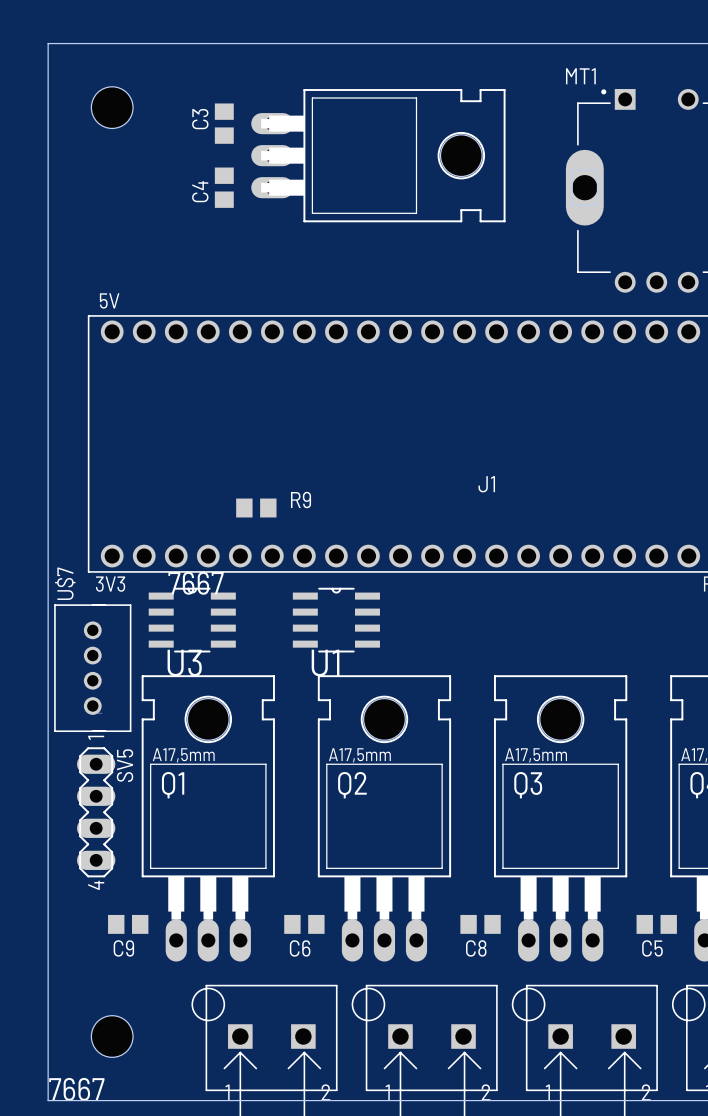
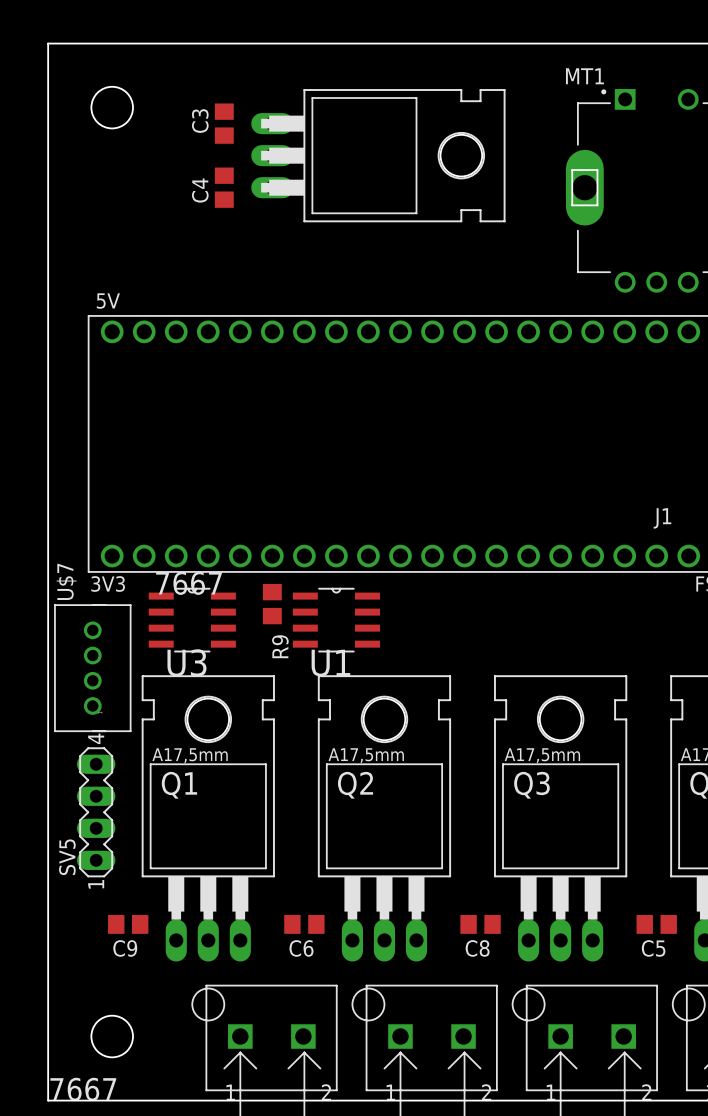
J1 name position: J1 (486, 484) -> J1 (662, 518)
R9 rotation: 0° (256, 508) -> 90° clockwise (272, 604)
R9 position: (256, 508) -> (272, 604)
SV5 text position: 1 (96, 737) -> 1 (96, 884)
SV5 name position: SV5 (125, 765) -> SV5 (67, 857)
SV5 text position: 4 (96, 885) -> 4 (96, 738)

